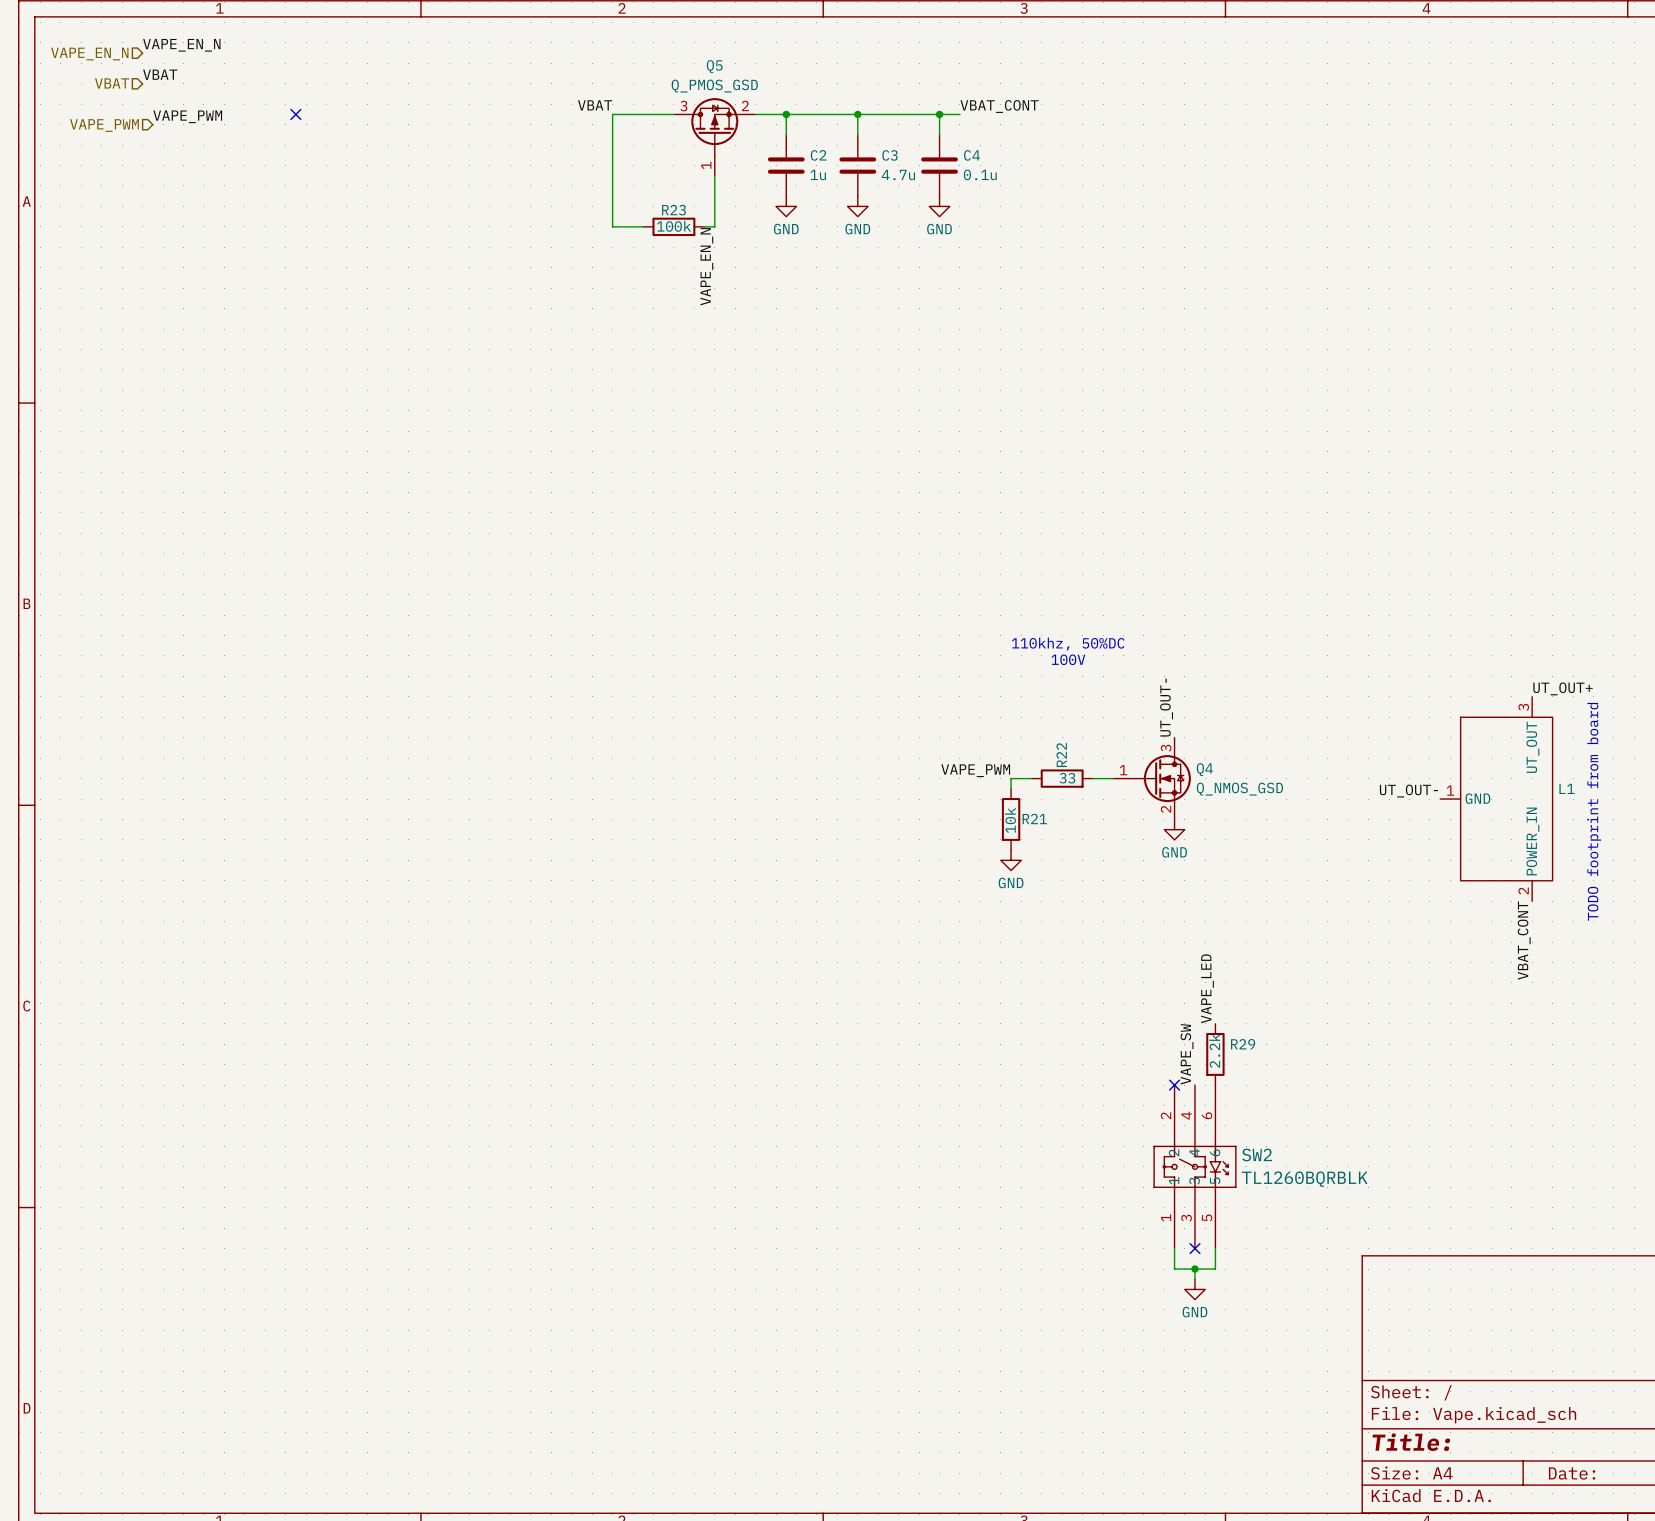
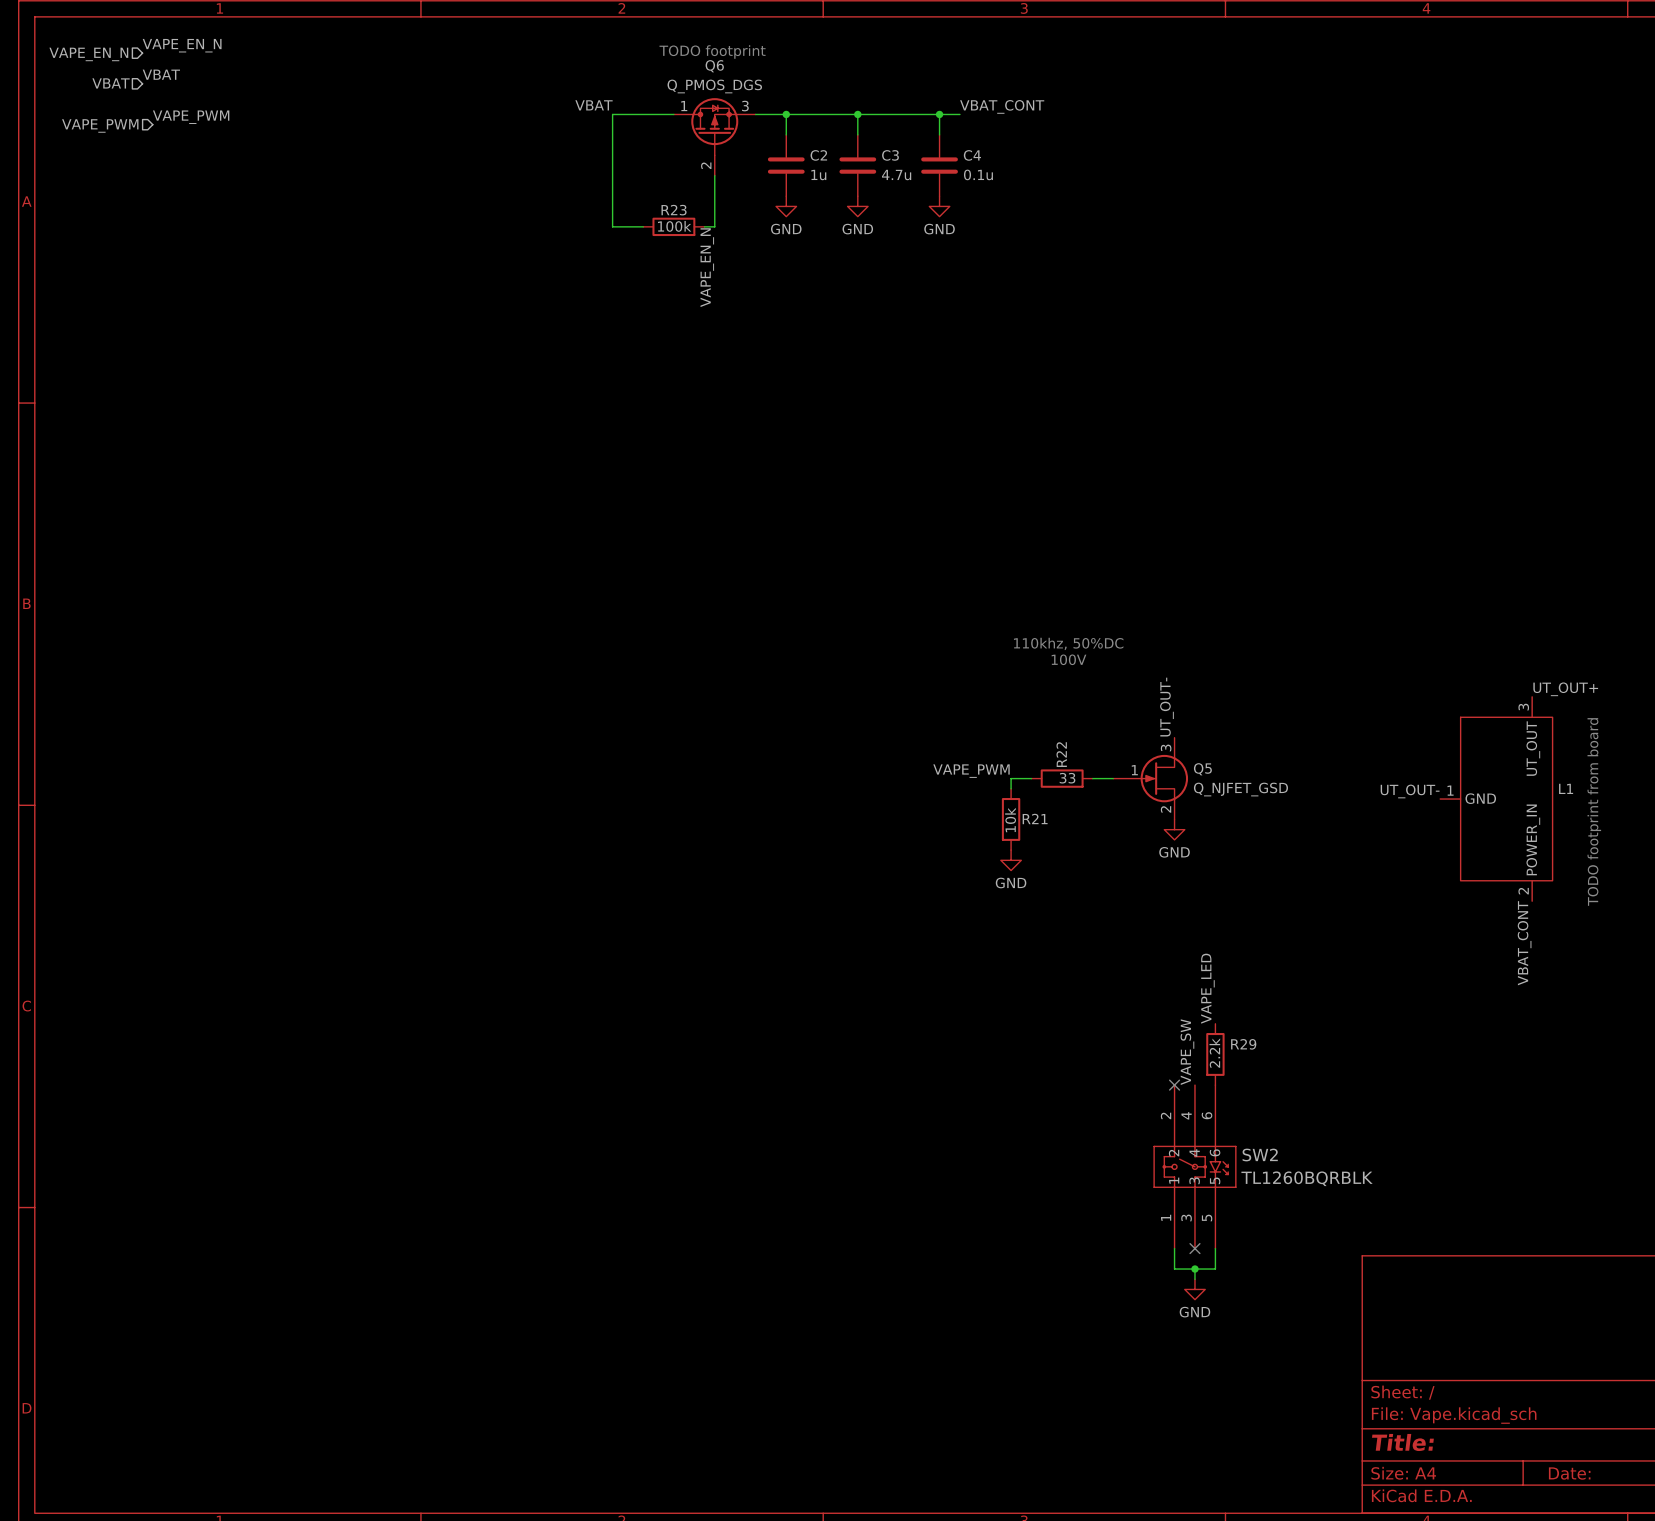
text: none -> TODO footprint (712, 52)
Q5 name position: Q5 (714, 66) -> Q5 (1202, 769)
Q5 value: Q_PMOS_GSD (714, 86) -> Q_NJFET_GSD (1240, 789)
Q5 symbol: [673, 98, 756, 176] -> [1113, 737, 1189, 820]
no-connect mark: (295, 114) -> none
Q6: none -> Q_PMOS_DGS (714, 136)
Q4: Q_NMOS_GSD (1152, 778) -> none

